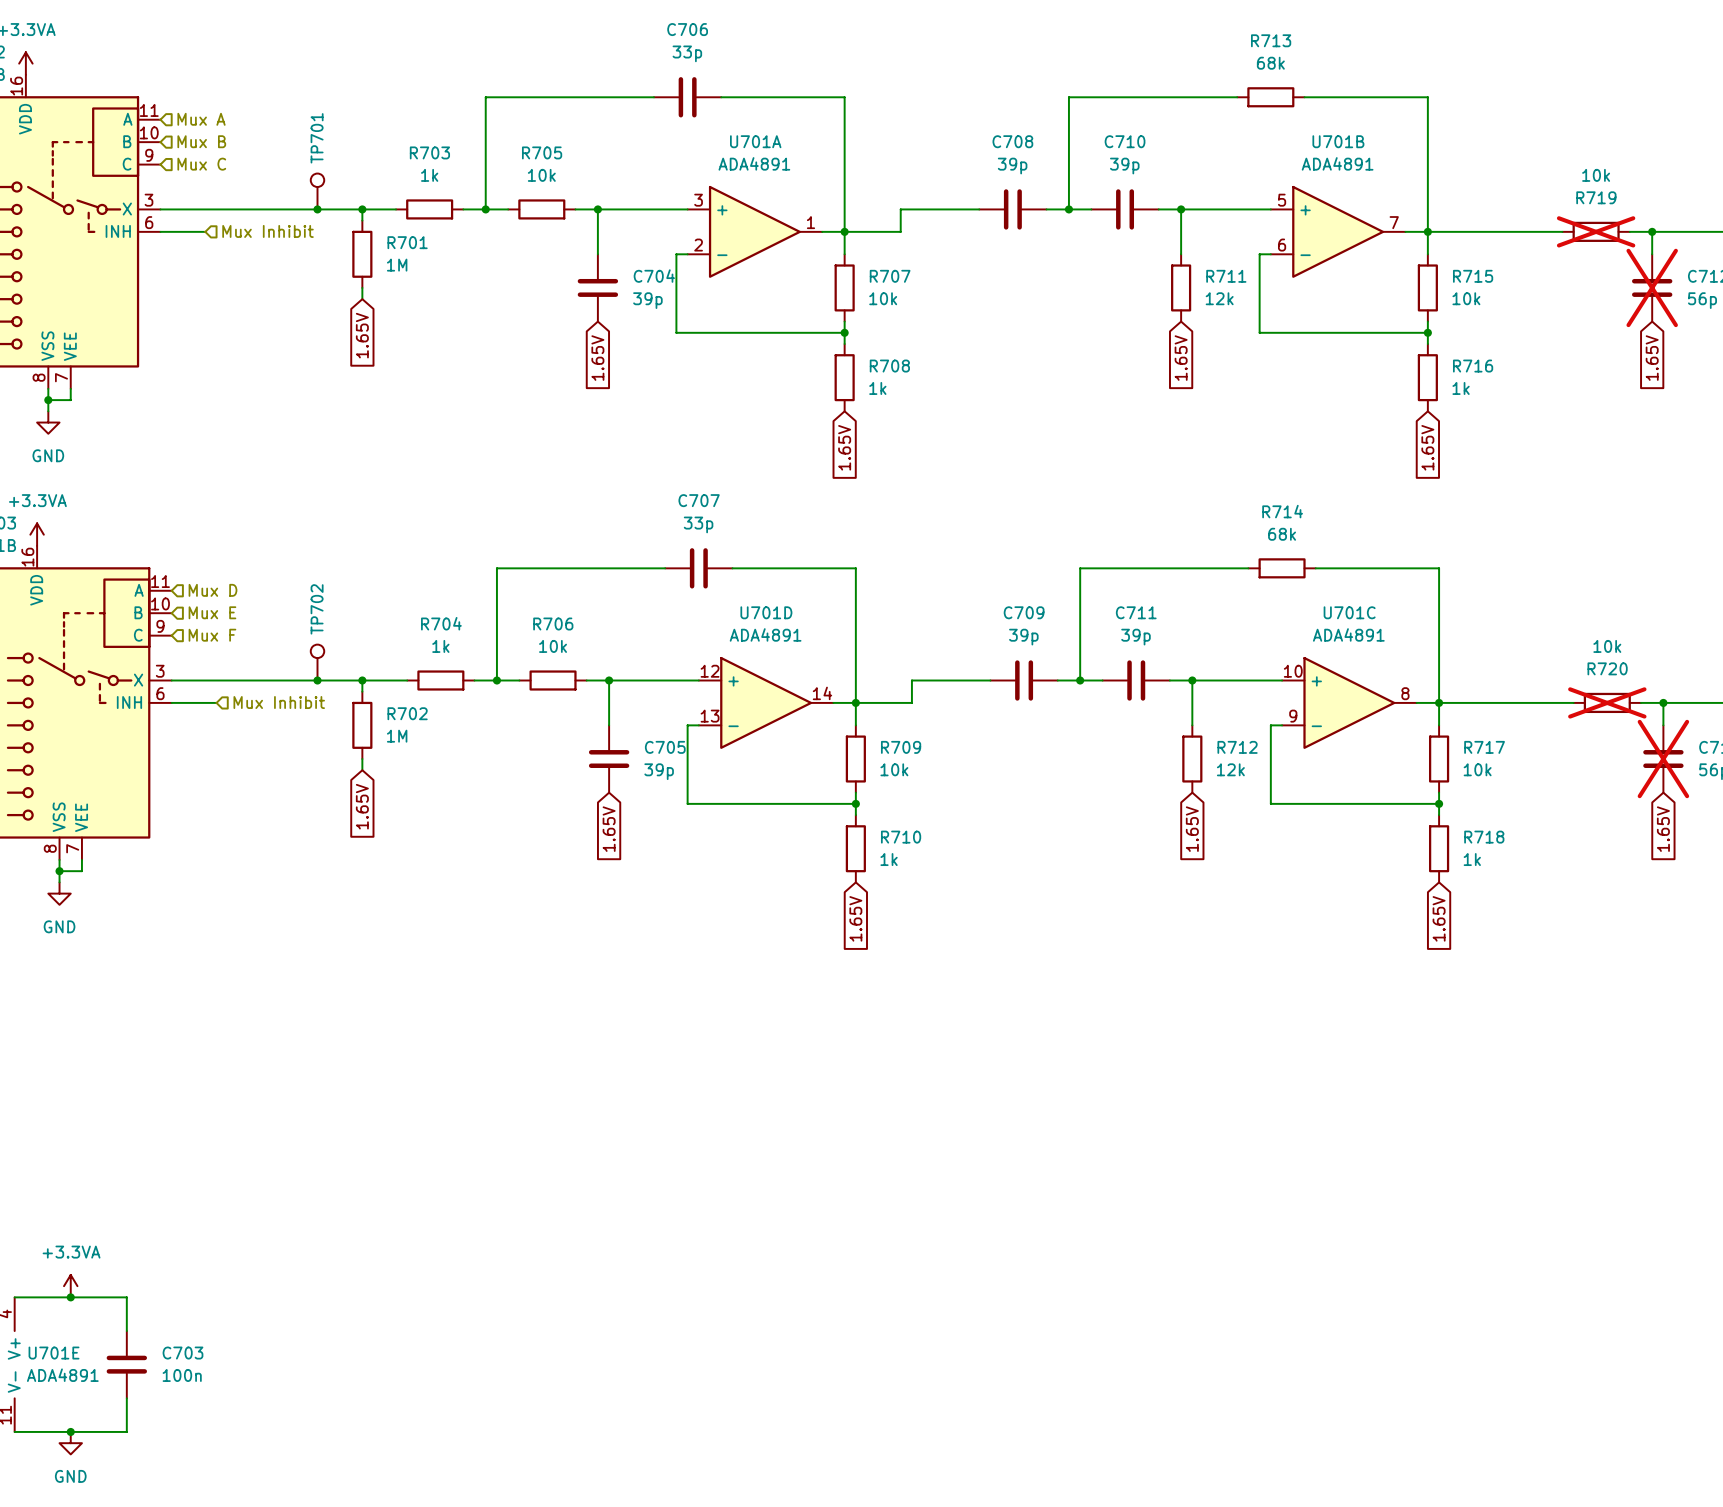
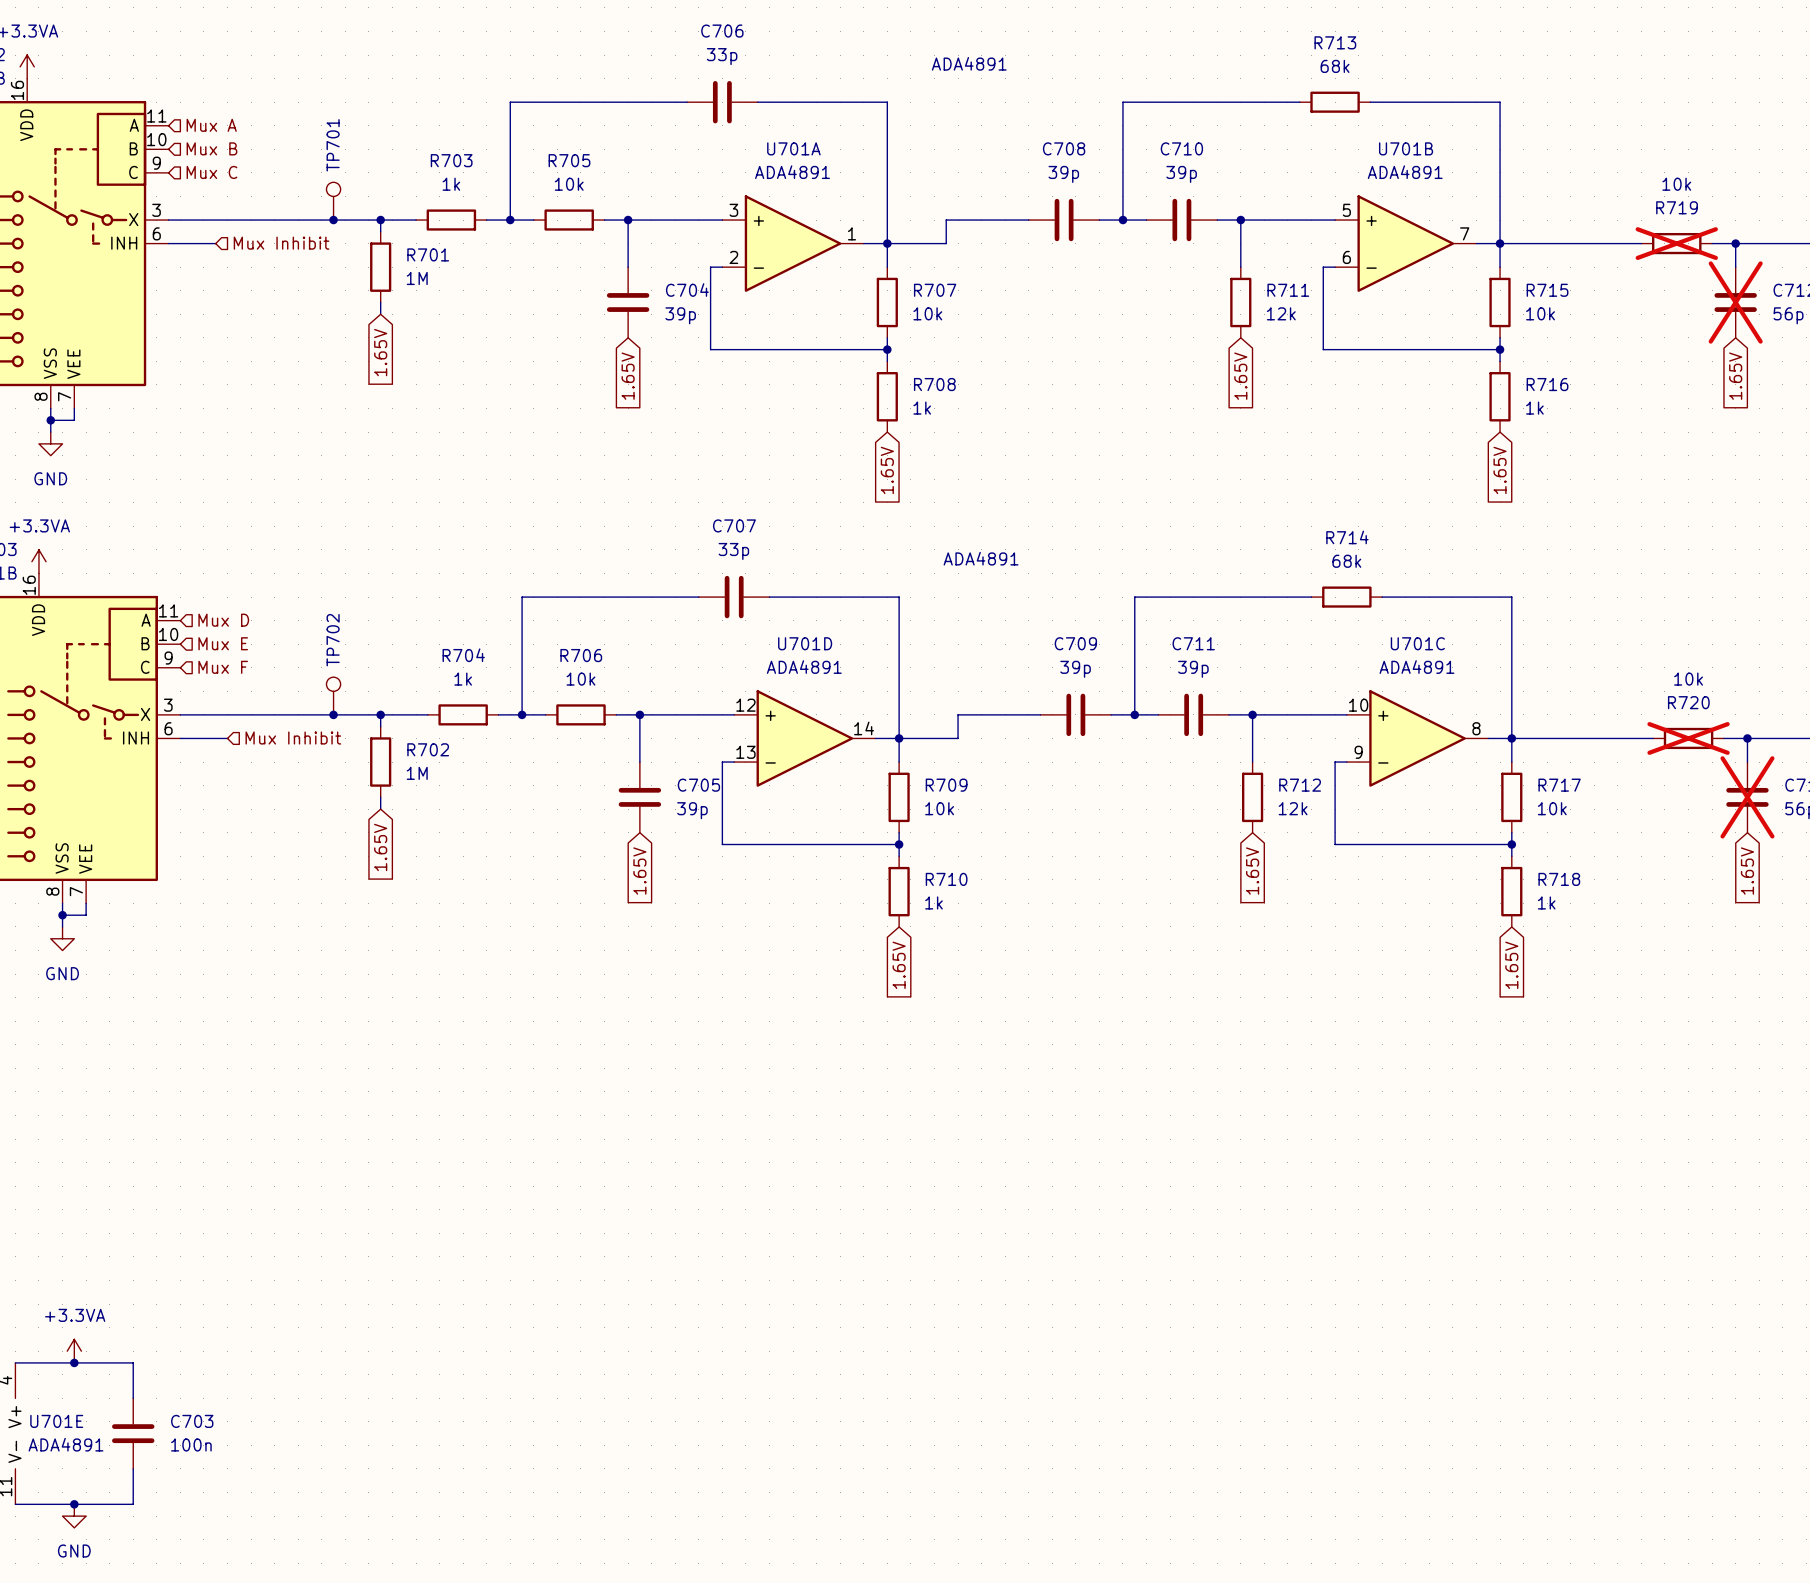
text: none -> ADA4891 (969, 63)
text: none -> ADA4891 (981, 558)

